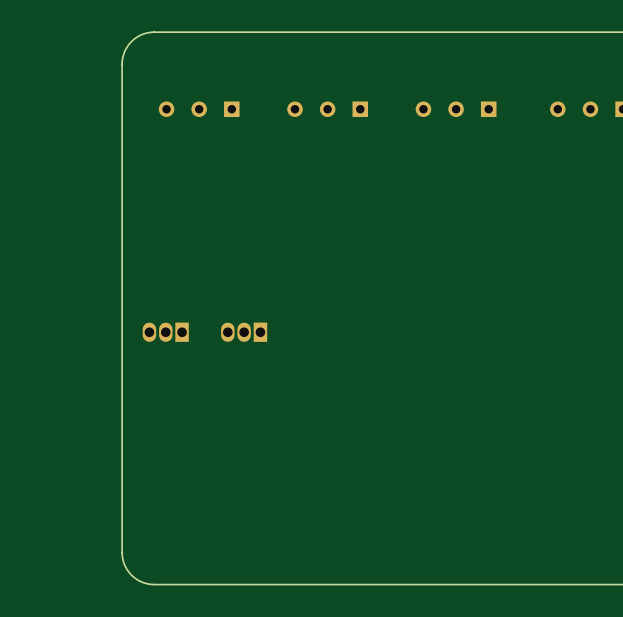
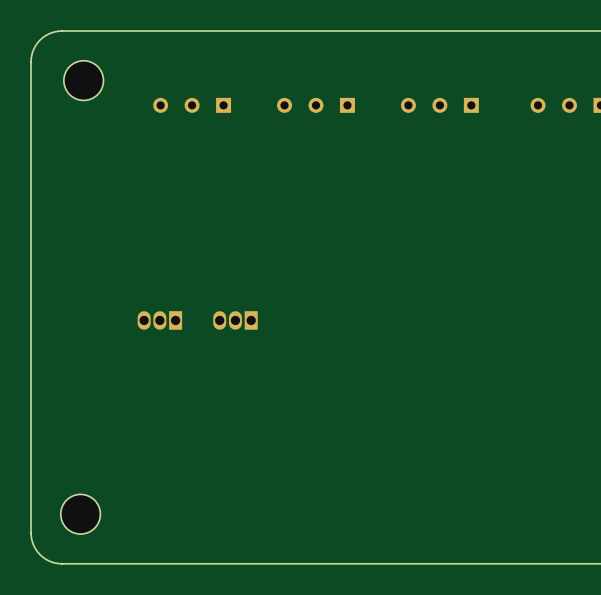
board edge: (154, 32) (140, 35) (131, 41) (125, 50) (122, 64) (122, 556) (125, 566) (134, 577) (143, 582) (154, 584) -> (148, 31) (55, 31) (45, 35) (37, 42) (32, 51) (31, 62) (31, 539) (40, 554) (55, 563) (148, 563)
part: none -> (83, 80)
part: none -> (80, 514)

